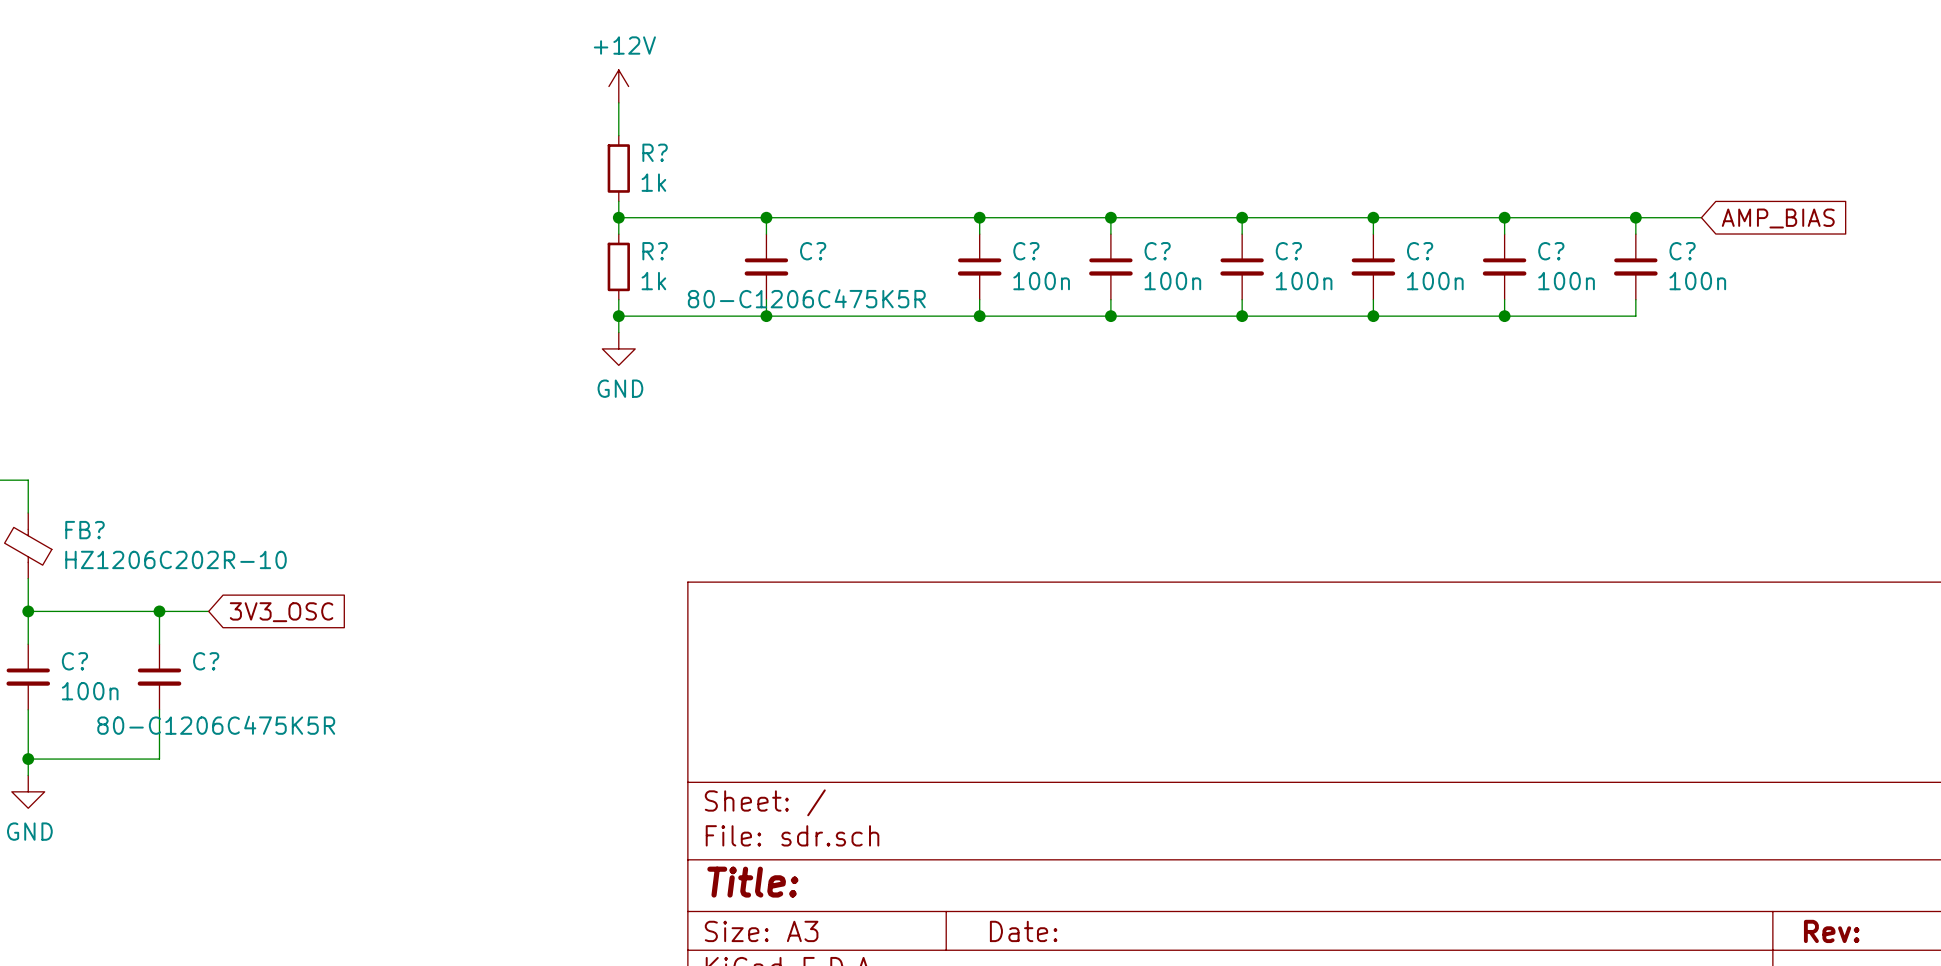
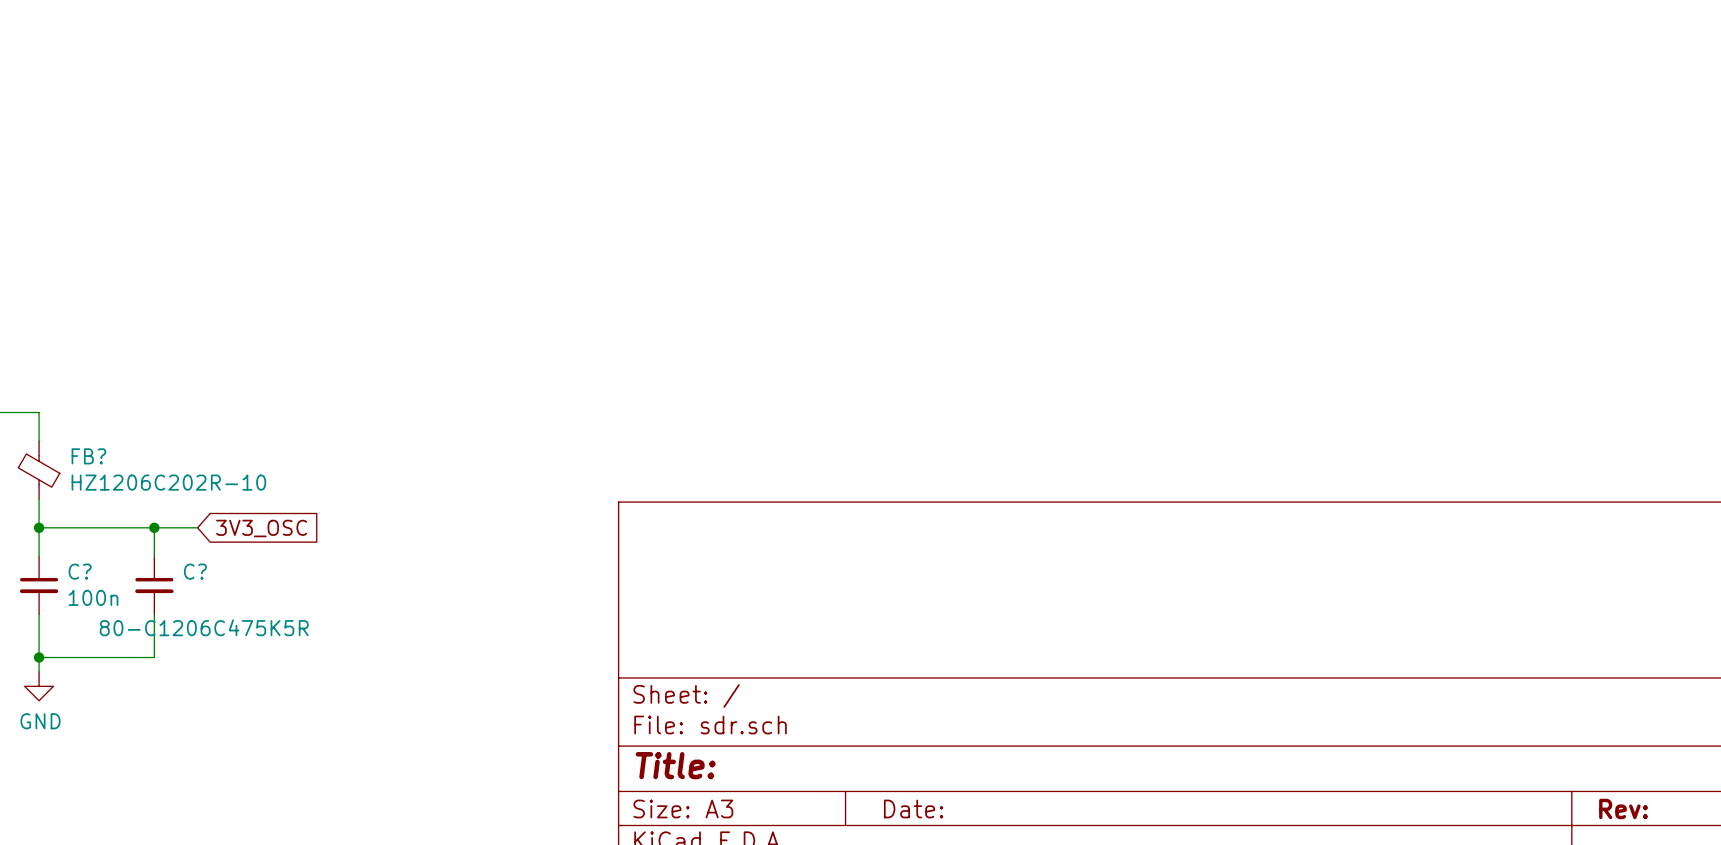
power symbol: +12V (618, 86) -> none
wire: (618, 102) (618, 135) -> none
R?: 1k (618, 168) -> none
wire: (618, 201) (618, 234) -> none
wire: (618, 217) (1701, 217) -> none
junction: (618, 217) -> none
wire: (766, 217) (766, 234) -> none
junction: (766, 217) -> none
wire: (979, 217) (979, 234) -> none
junction: (979, 217) -> none
wire: (1110, 217) (1110, 234) -> none
junction: (1110, 217) -> none
wire: (1242, 217) (1242, 234) -> none
junction: (1242, 217) -> none
wire: (1373, 217) (1373, 234) -> none
junction: (1373, 217) -> none
wire: (1504, 217) (1504, 234) -> none
junction: (1504, 217) -> none
wire: (1635, 217) (1635, 234) -> none
junction: (1635, 217) -> none
global label: AMP_BIAS (1778, 218) -> none
R?: 1k (618, 266) -> none
C?: 80-C1206C475K5R (766, 266) -> none
C?: 100n (979, 266) -> none
C?: 100n (1110, 266) -> none
C?: 100n (1242, 266) -> none
C?: 100n (1373, 266) -> none
C?: 100n (1504, 266) -> none
C?: 100n (1635, 266) -> none
wire: (618, 299) (618, 332) -> none
wire: (766, 299) (766, 316) -> none
wire: (979, 299) (979, 316) -> none
wire: (1110, 299) (1110, 316) -> none
wire: (1242, 299) (1242, 316) -> none
wire: (1373, 299) (1373, 316) -> none
wire: (1504, 299) (1504, 316) -> none
wire: (1635, 299) (1635, 316) (618, 316) -> none
junction: (618, 316) -> none
junction: (766, 316) -> none
junction: (979, 316) -> none
junction: (1110, 316) -> none
junction: (1242, 316) -> none
junction: (1373, 316) -> none
junction: (1504, 316) -> none
power symbol: GND (618, 348) -> none

